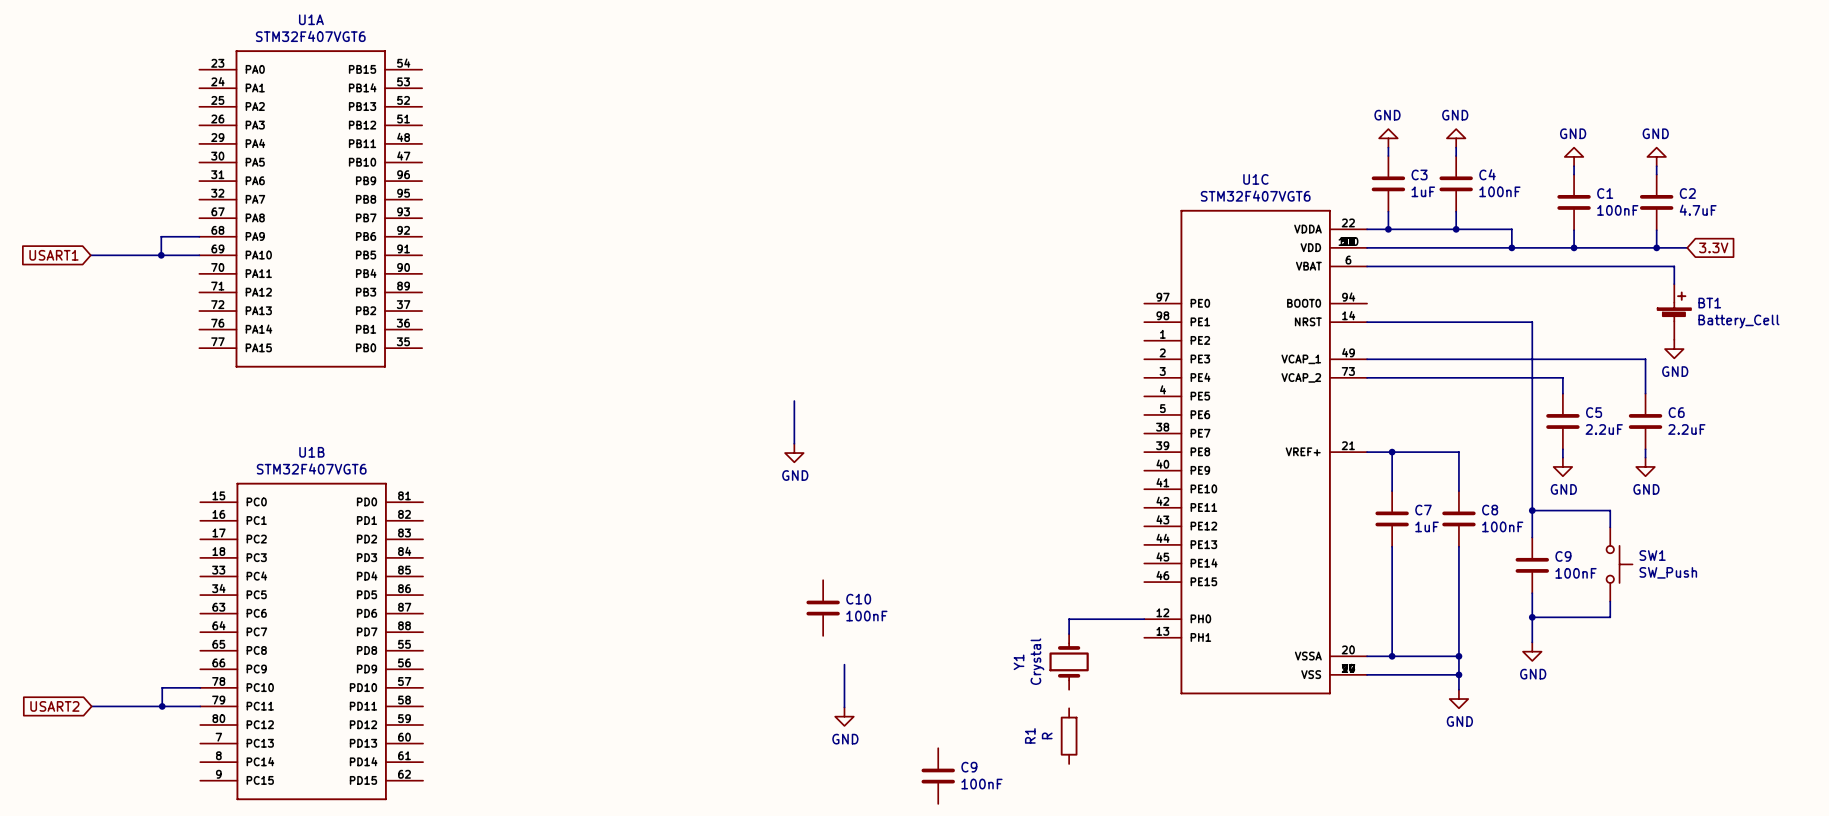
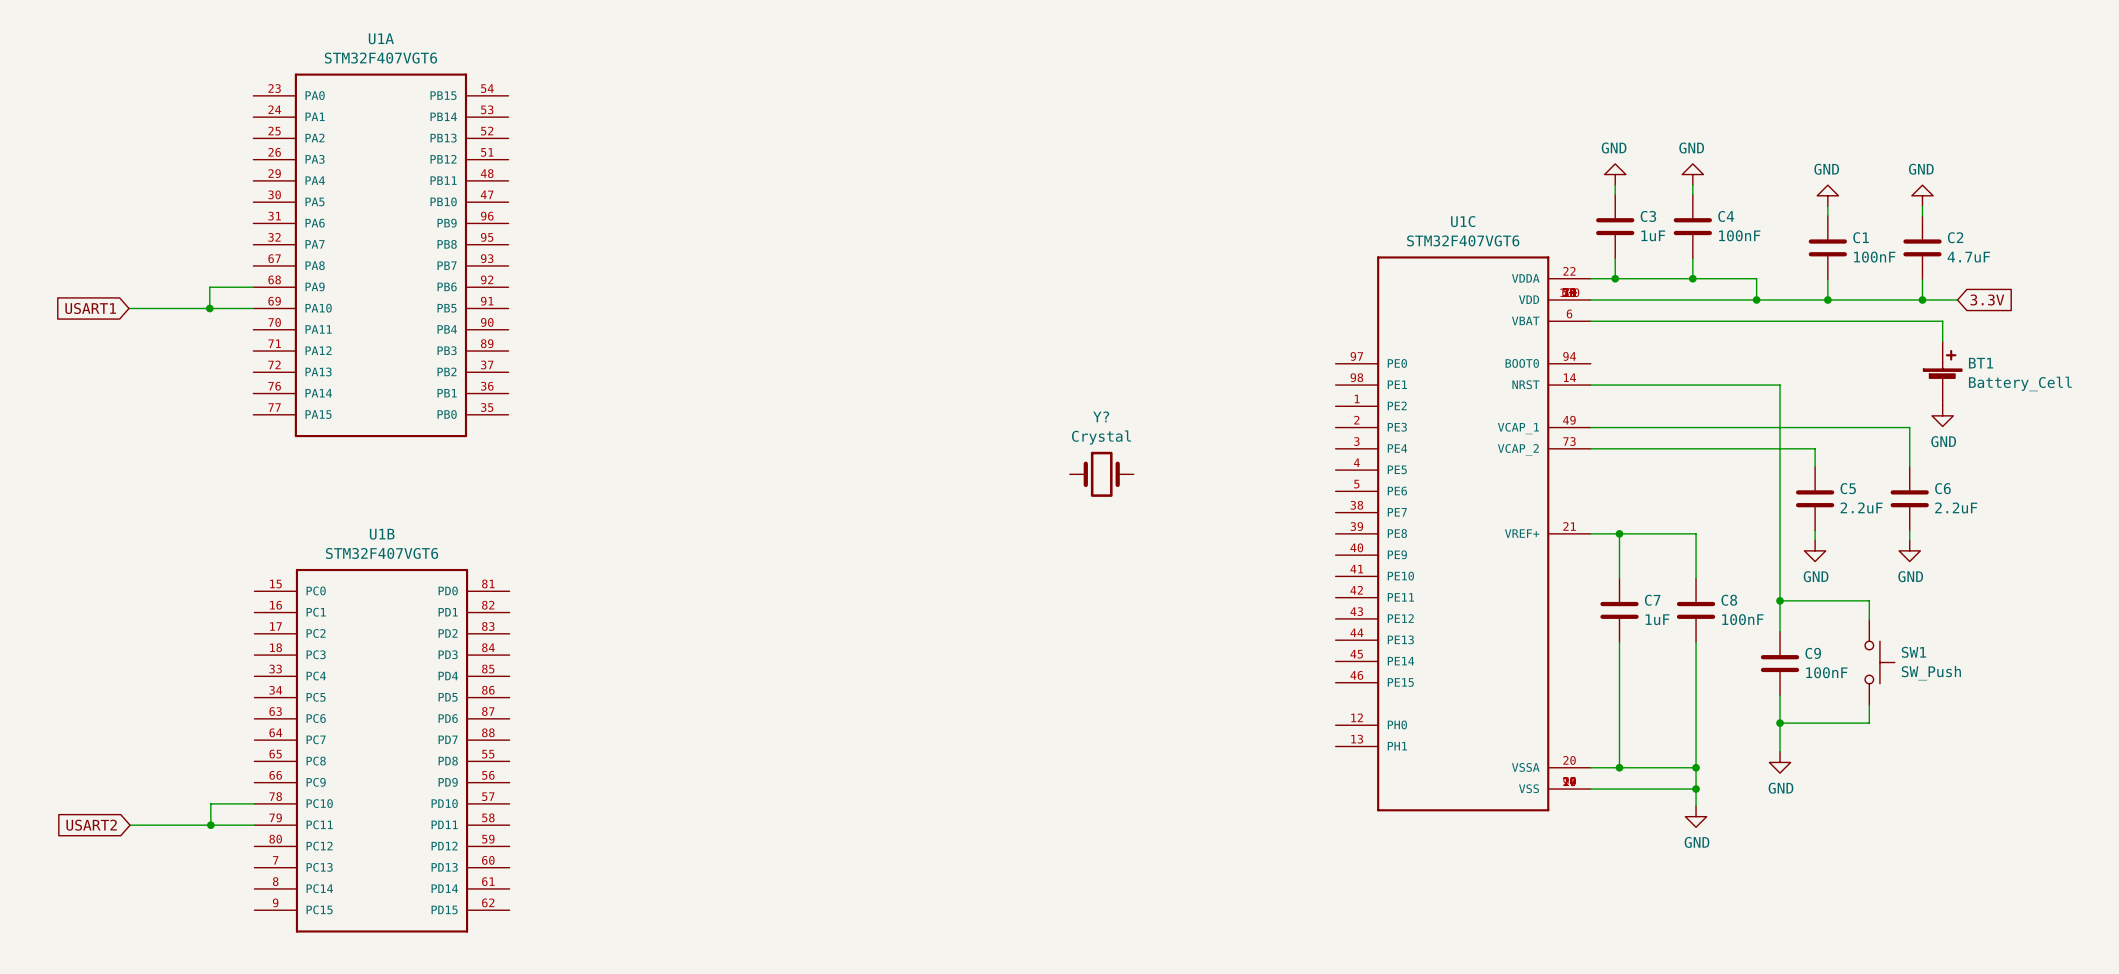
Y?: none -> Crystal (1101, 474)
wire: (794, 401) (794, 443) -> none
power symbol: GND (794, 453) -> none
C10: 100nF (823, 608) -> none
wire: (1144, 619) (1069, 619) (1069, 634) -> none
Y1: Crystal (1069, 661) -> none
wire: (844, 664) (844, 707) -> none
power symbol: GND (844, 716) -> none
R1: R (1069, 736) -> none
C9: 100nF (938, 776) -> none

